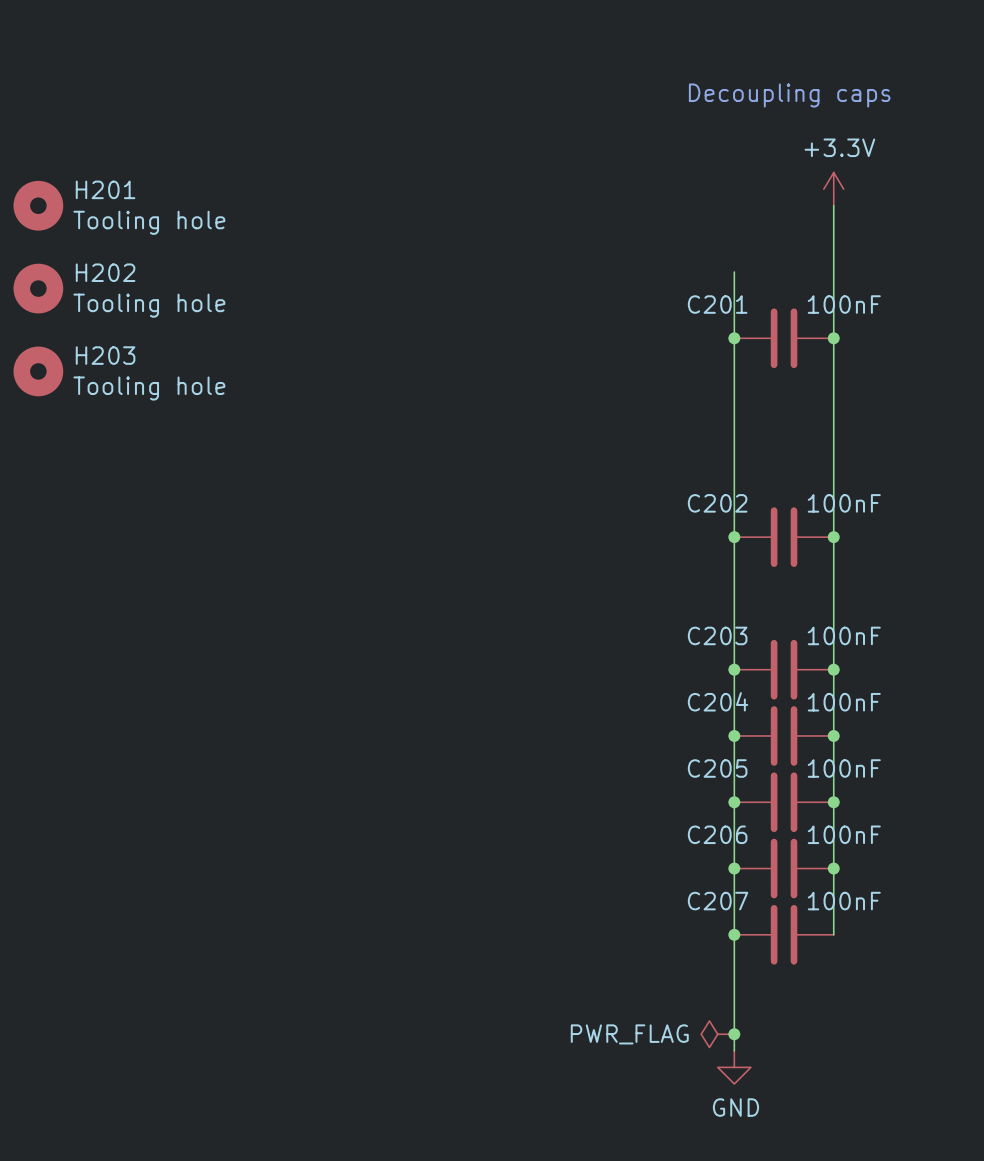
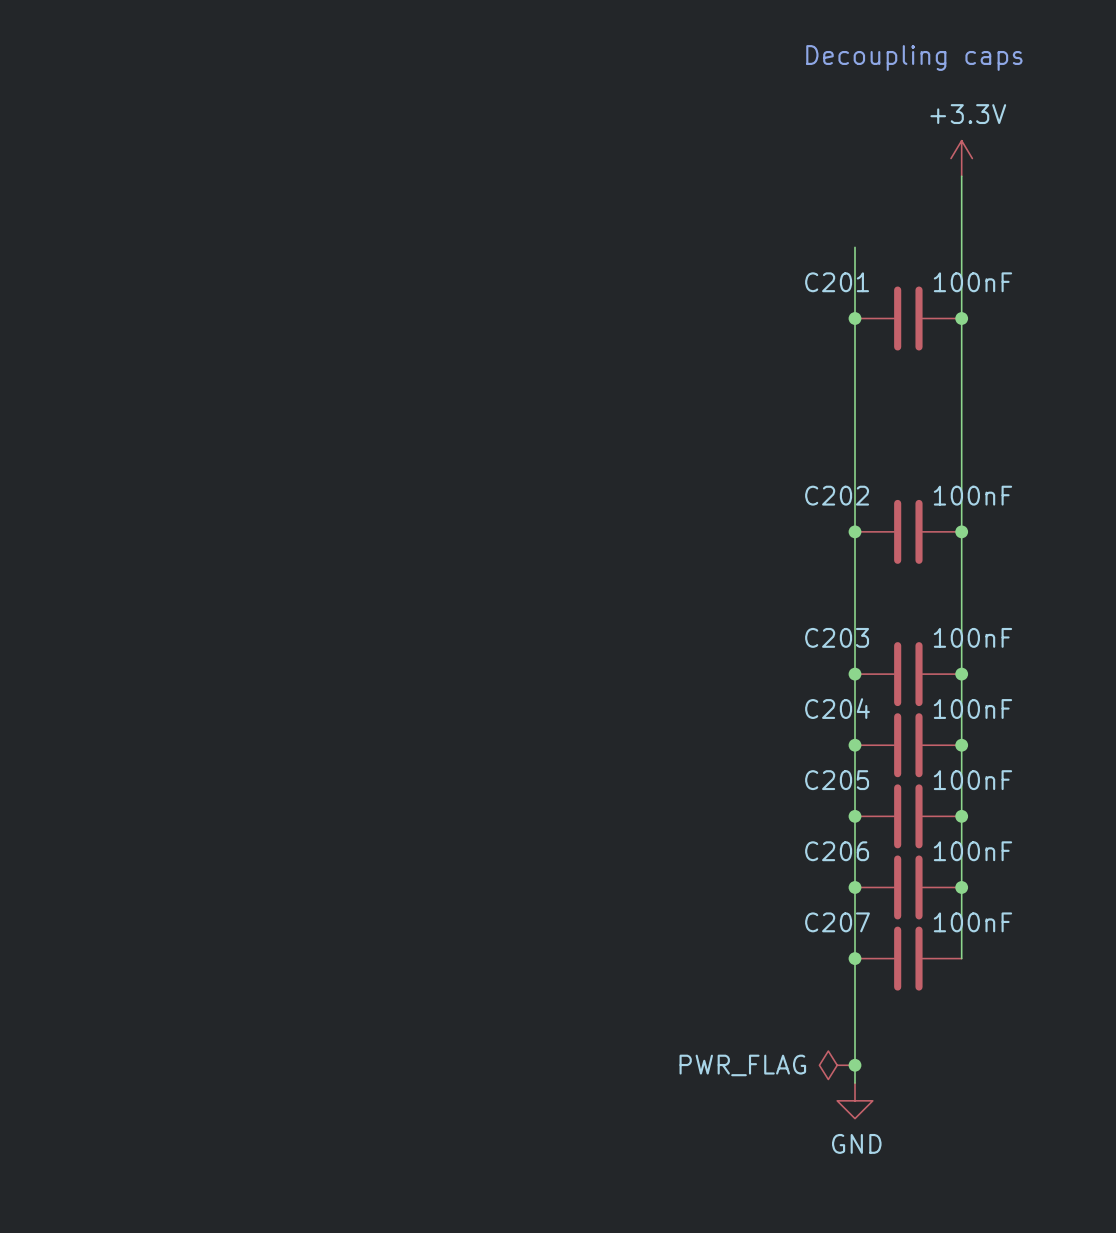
H201: Tooling hole (38, 205) -> none
H202: Tooling hole (38, 288) -> none
H203: Tooling hole (38, 371) -> none

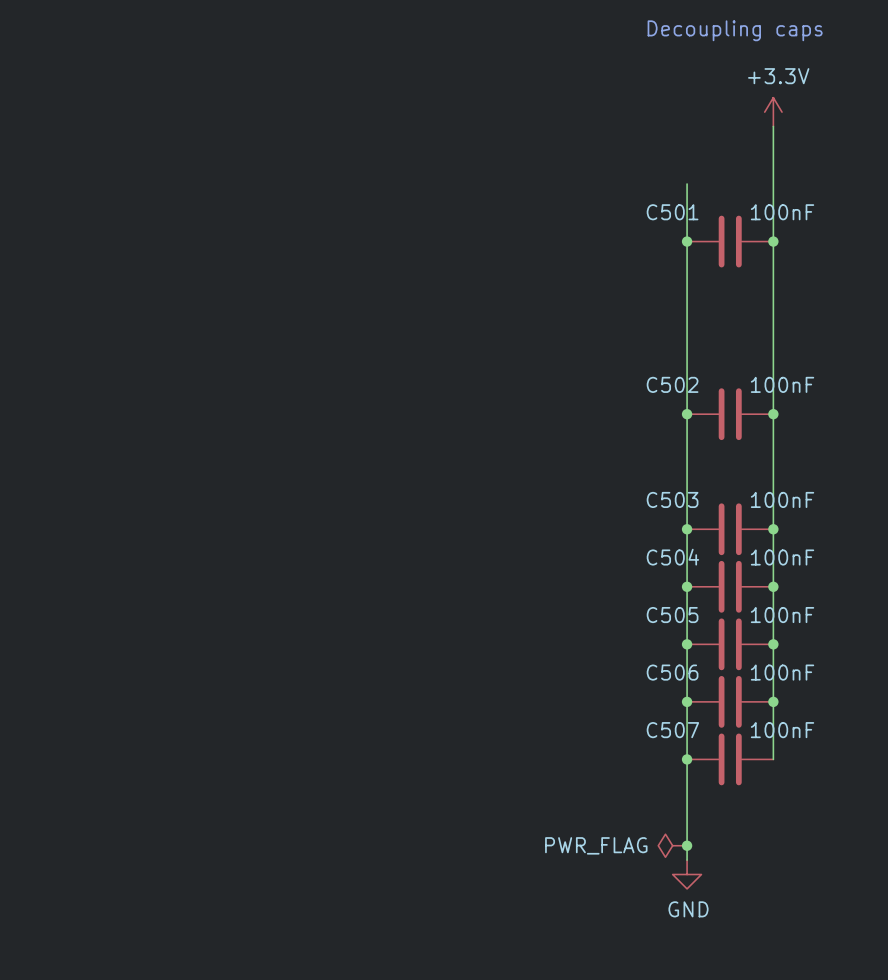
C201 name: C201 (837, 282) -> C501 (672, 212)
C202 name: C202 (837, 495) -> C502 (672, 384)
C203 name: C203 (837, 637) -> C503 (672, 499)
C204 name: C204 (837, 708) -> C504 (672, 557)
C205 name: C205 (837, 780) -> C505 (672, 615)
C206 name: C206 (837, 851) -> C506 (672, 672)
C207 name: C207 (837, 922) -> C507 (672, 730)

